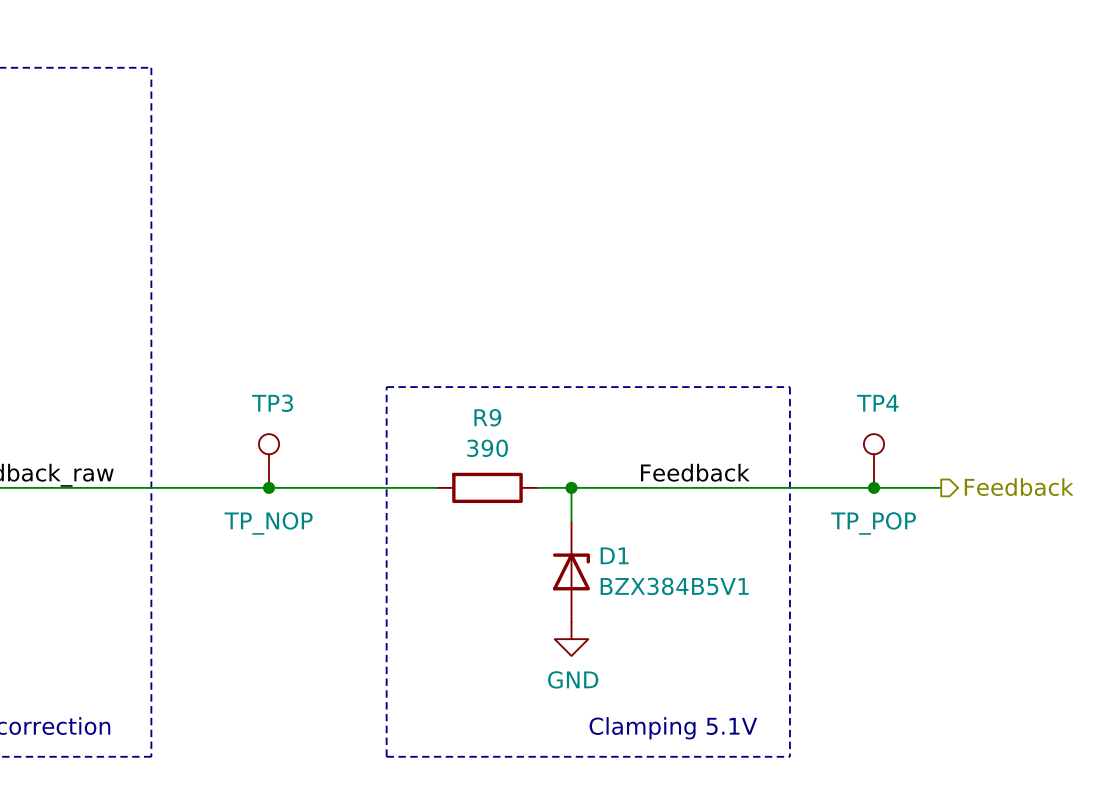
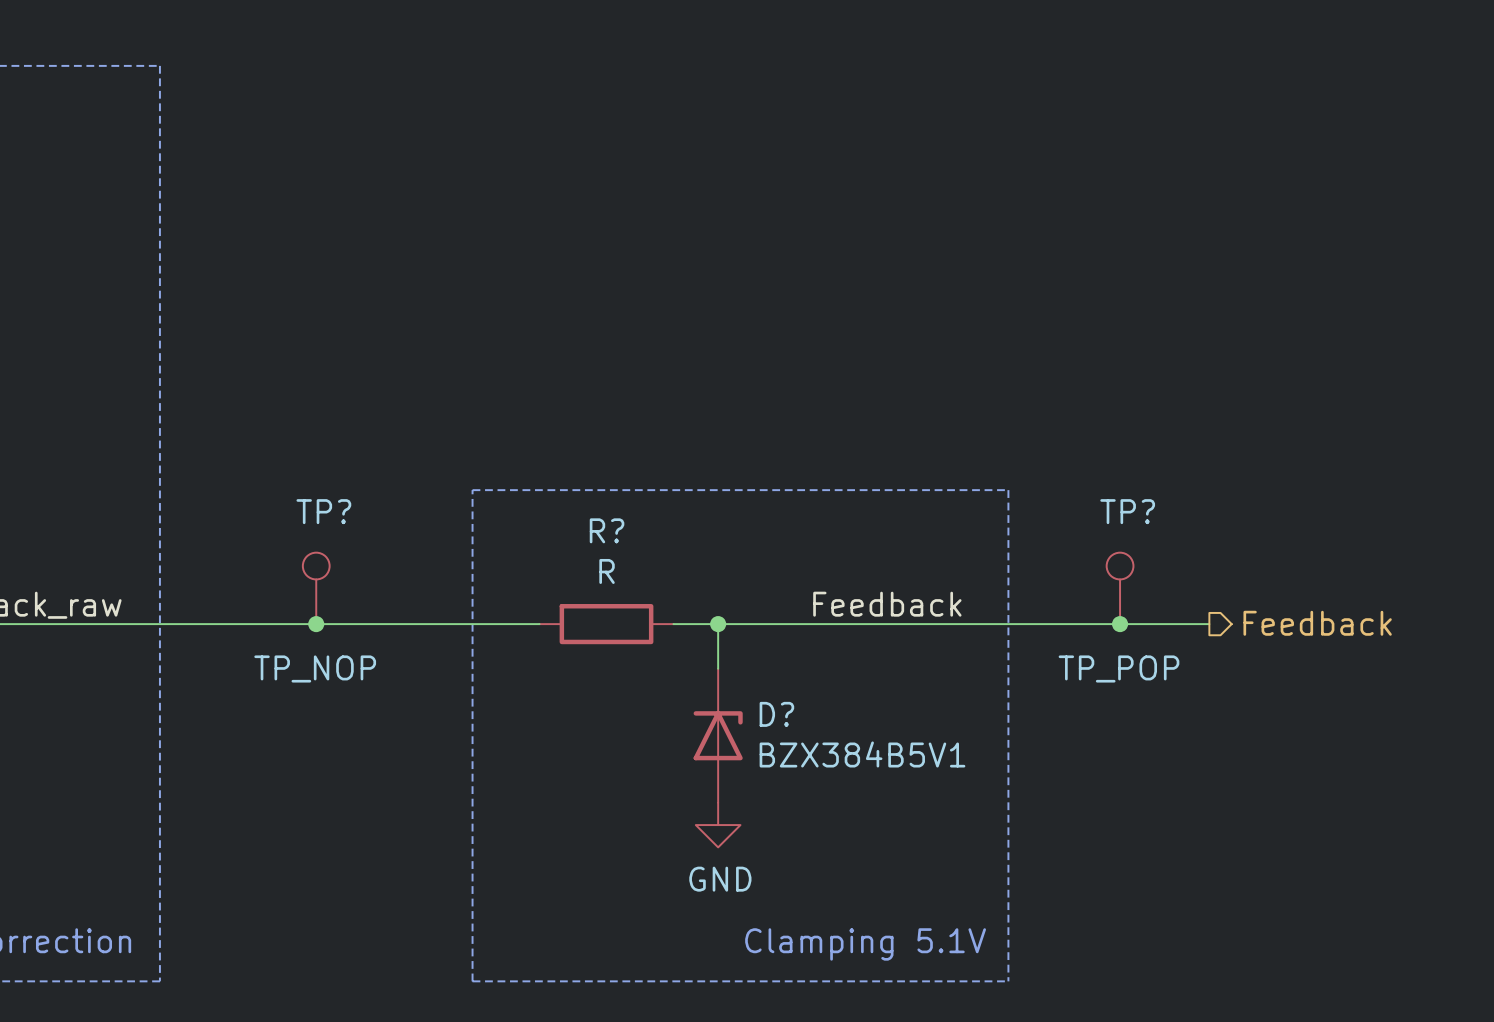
TP3 name: TP3 (272, 403) -> TP? (323, 511)
TP4 name: TP4 (877, 403) -> TP? (1127, 511)
R9 name: R9 (487, 417) -> R? (607, 530)
R9 value: 390 (487, 448) -> R (607, 571)
D1 name: D1 (614, 555) -> D? (776, 714)

